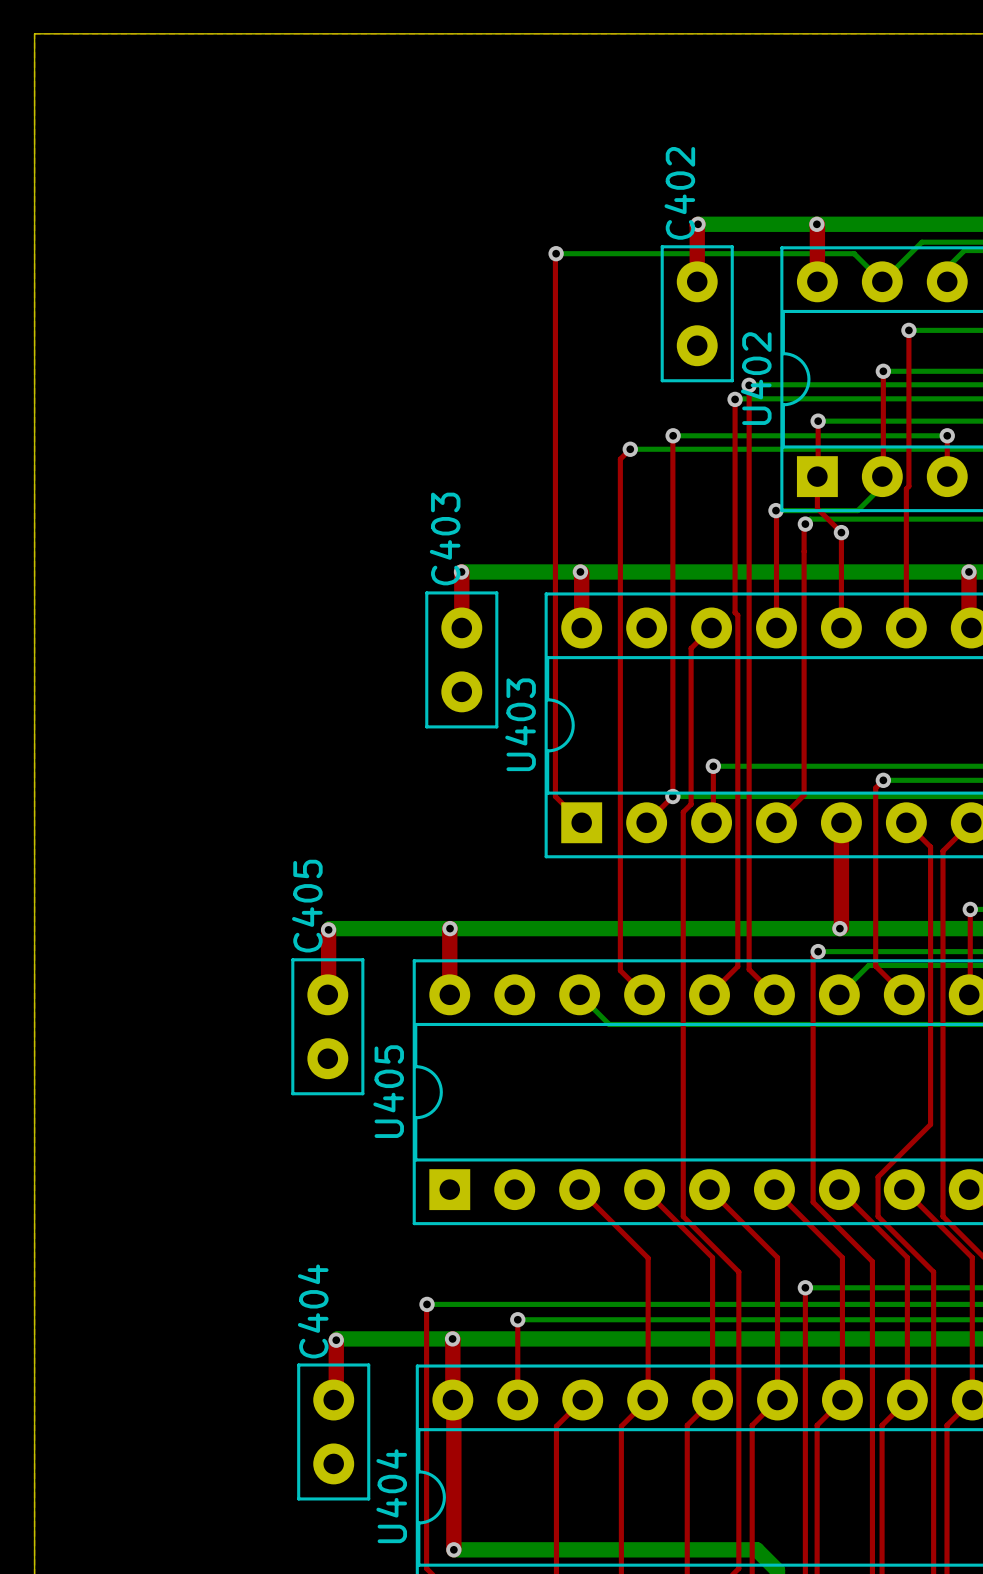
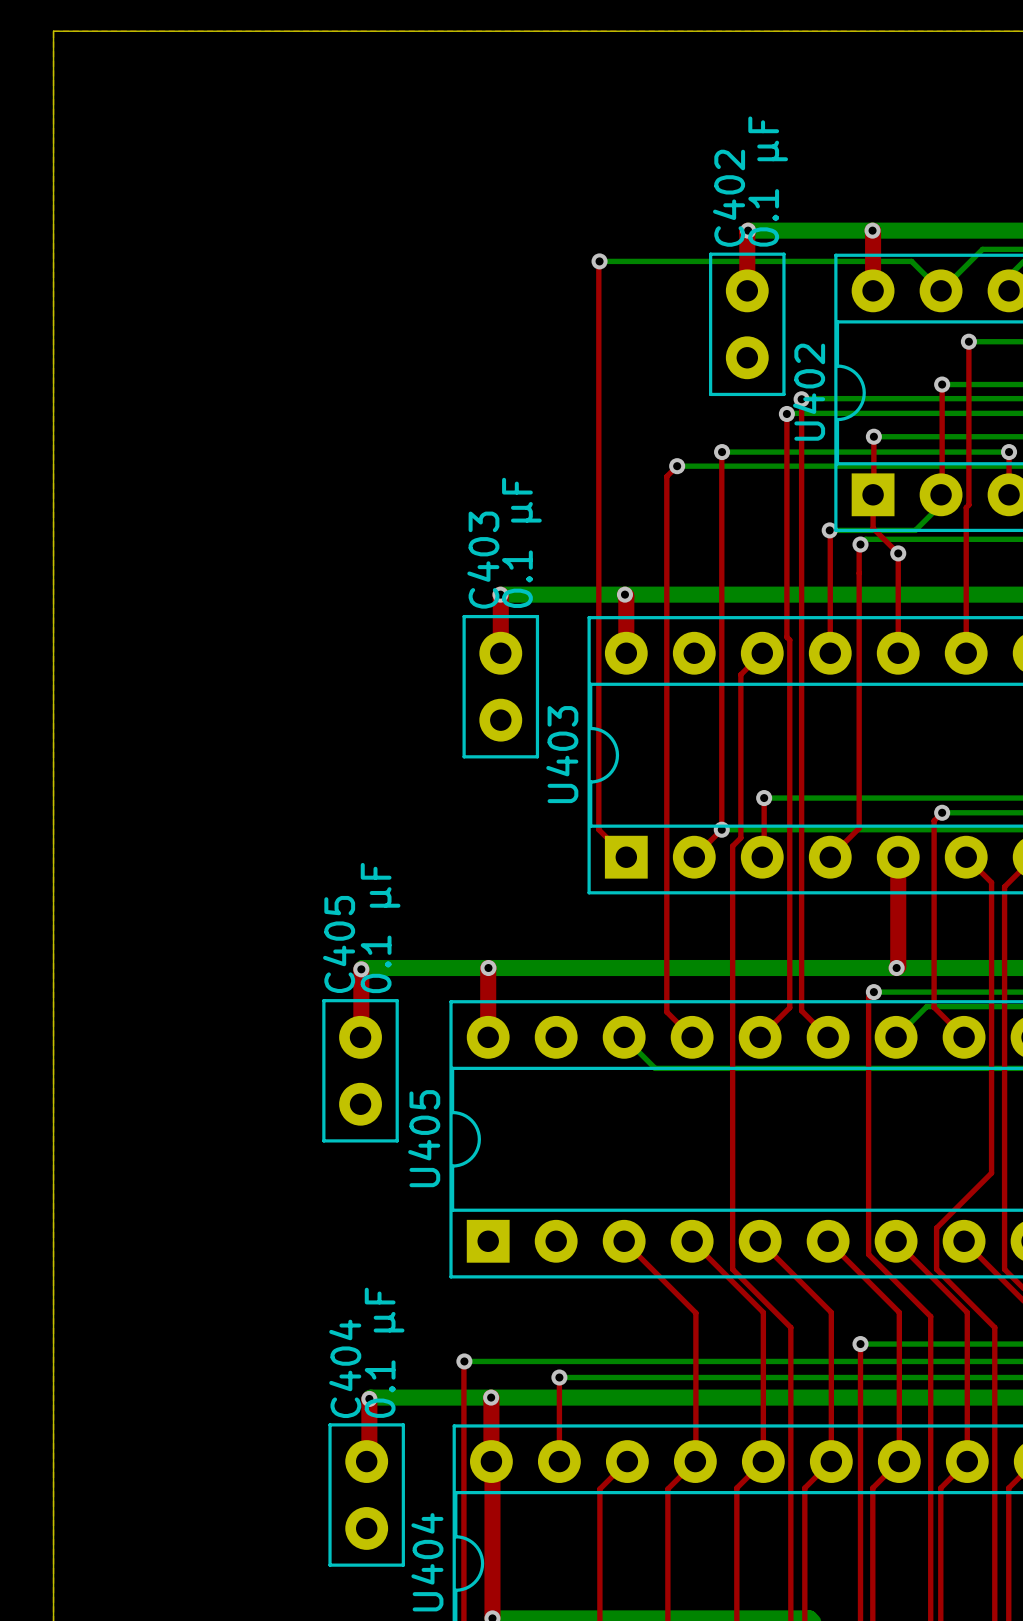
C402 value: none -> 0.1 μF (768, 181)
C403 value: none -> 0.1 μF (521, 542)
C405 value: none -> 0.1 μF (380, 928)
C404 value: none -> 0.1 μF (384, 1352)

